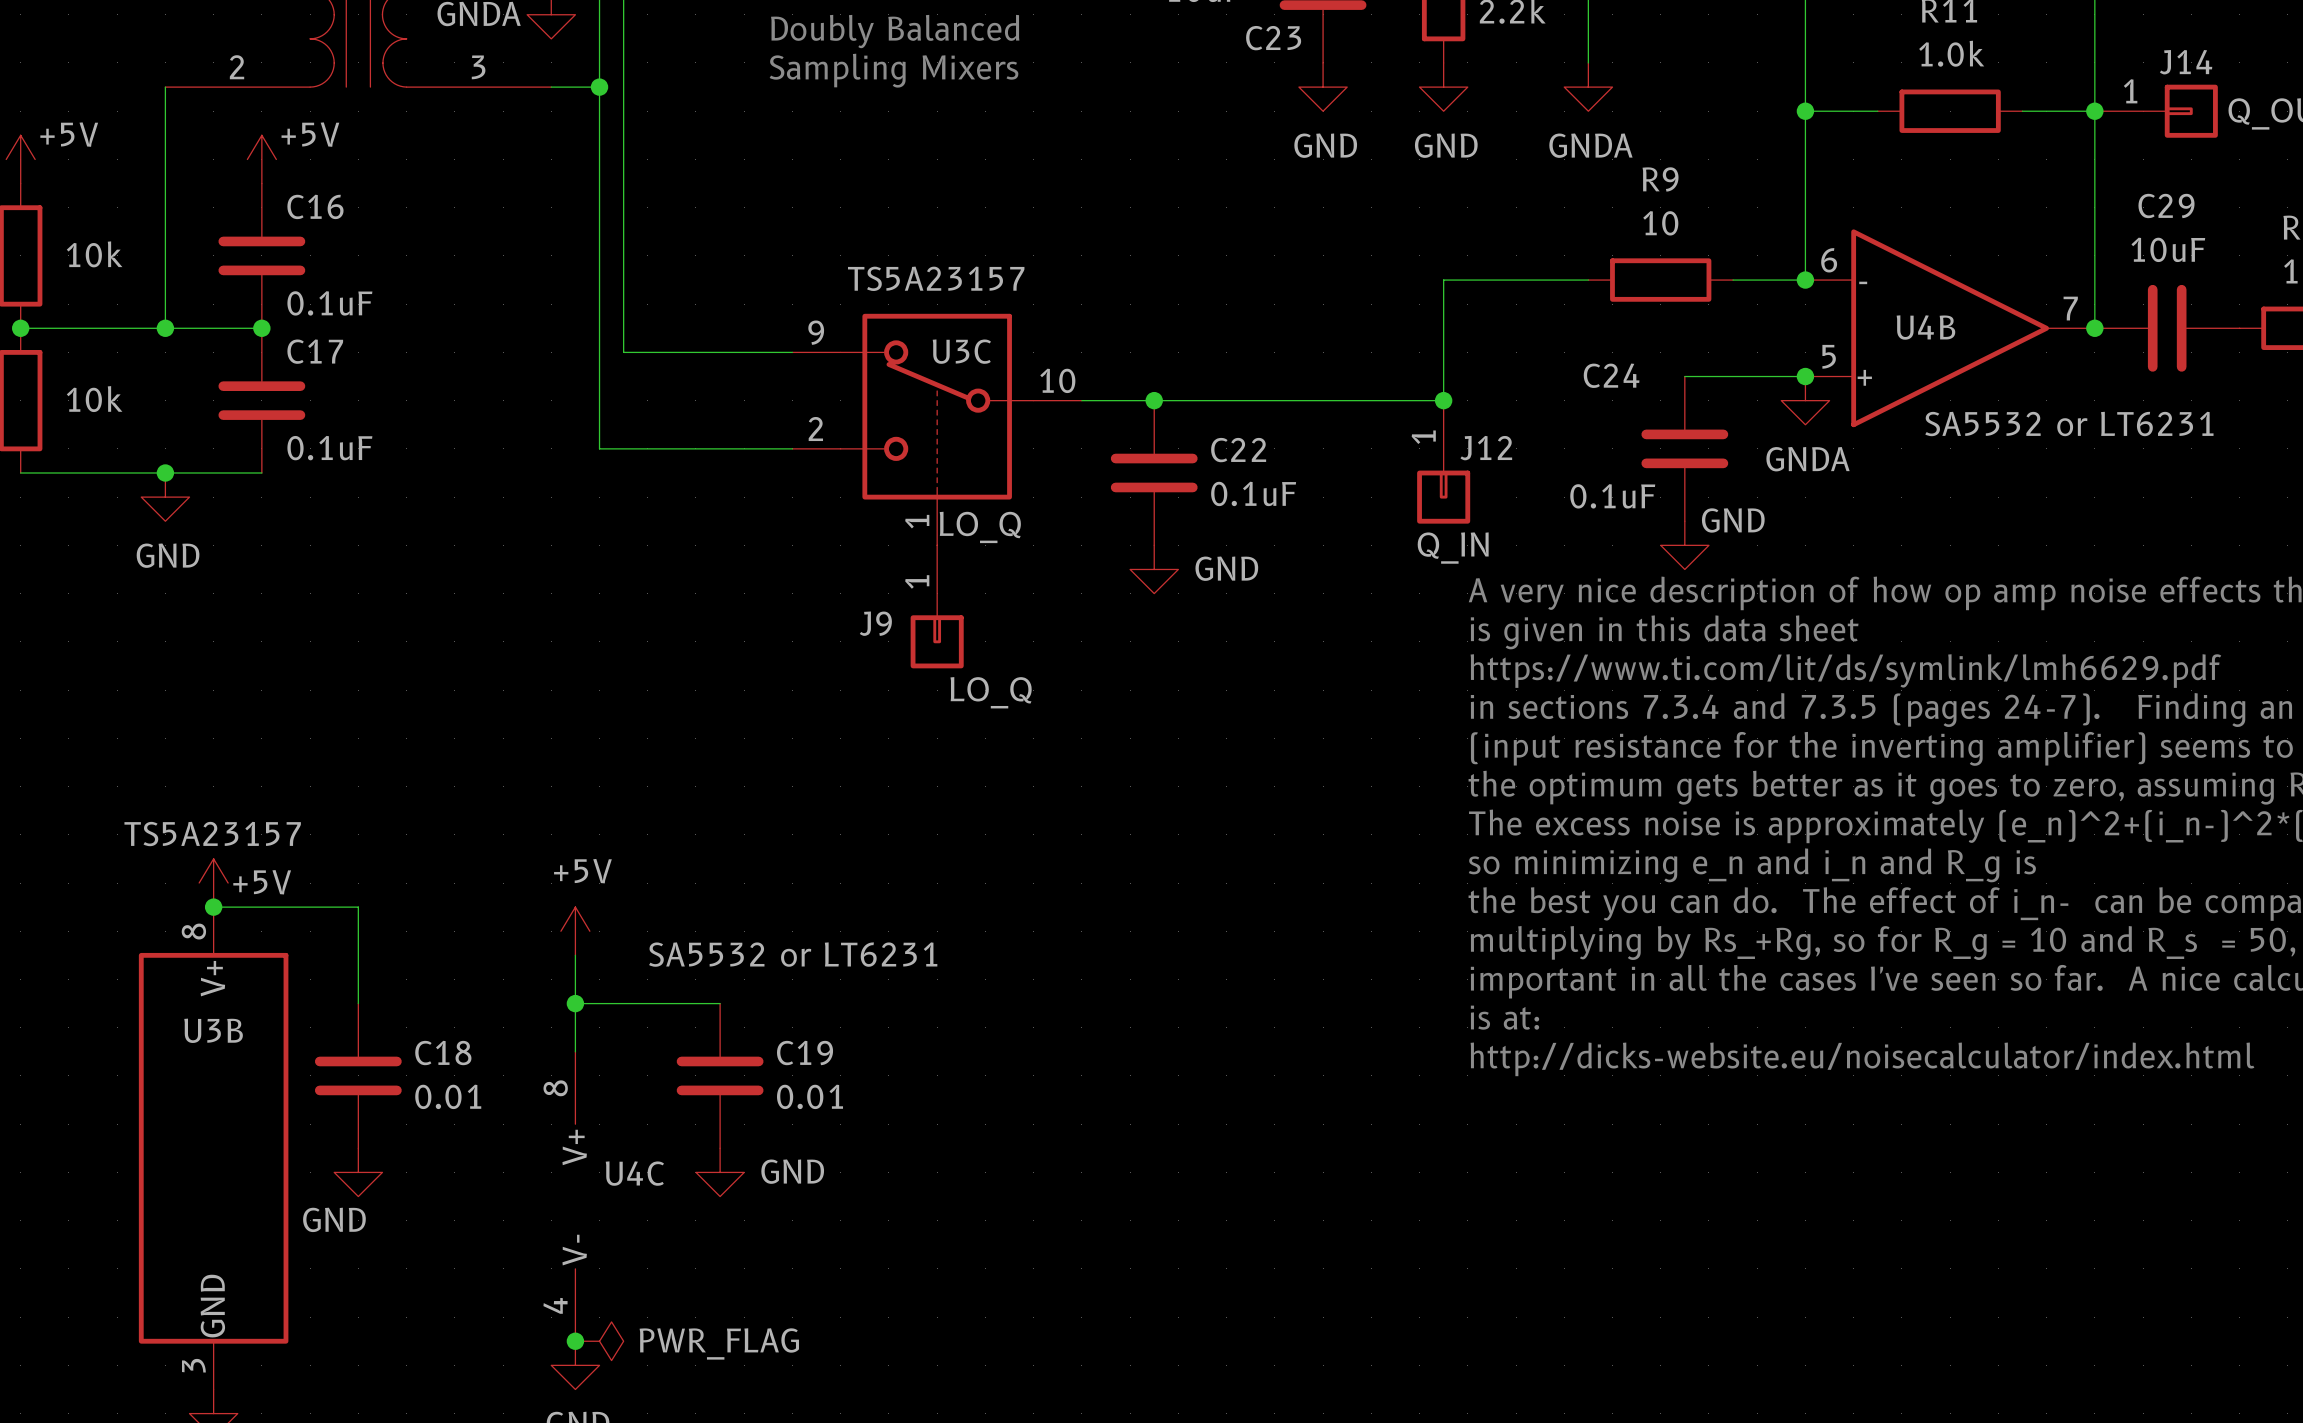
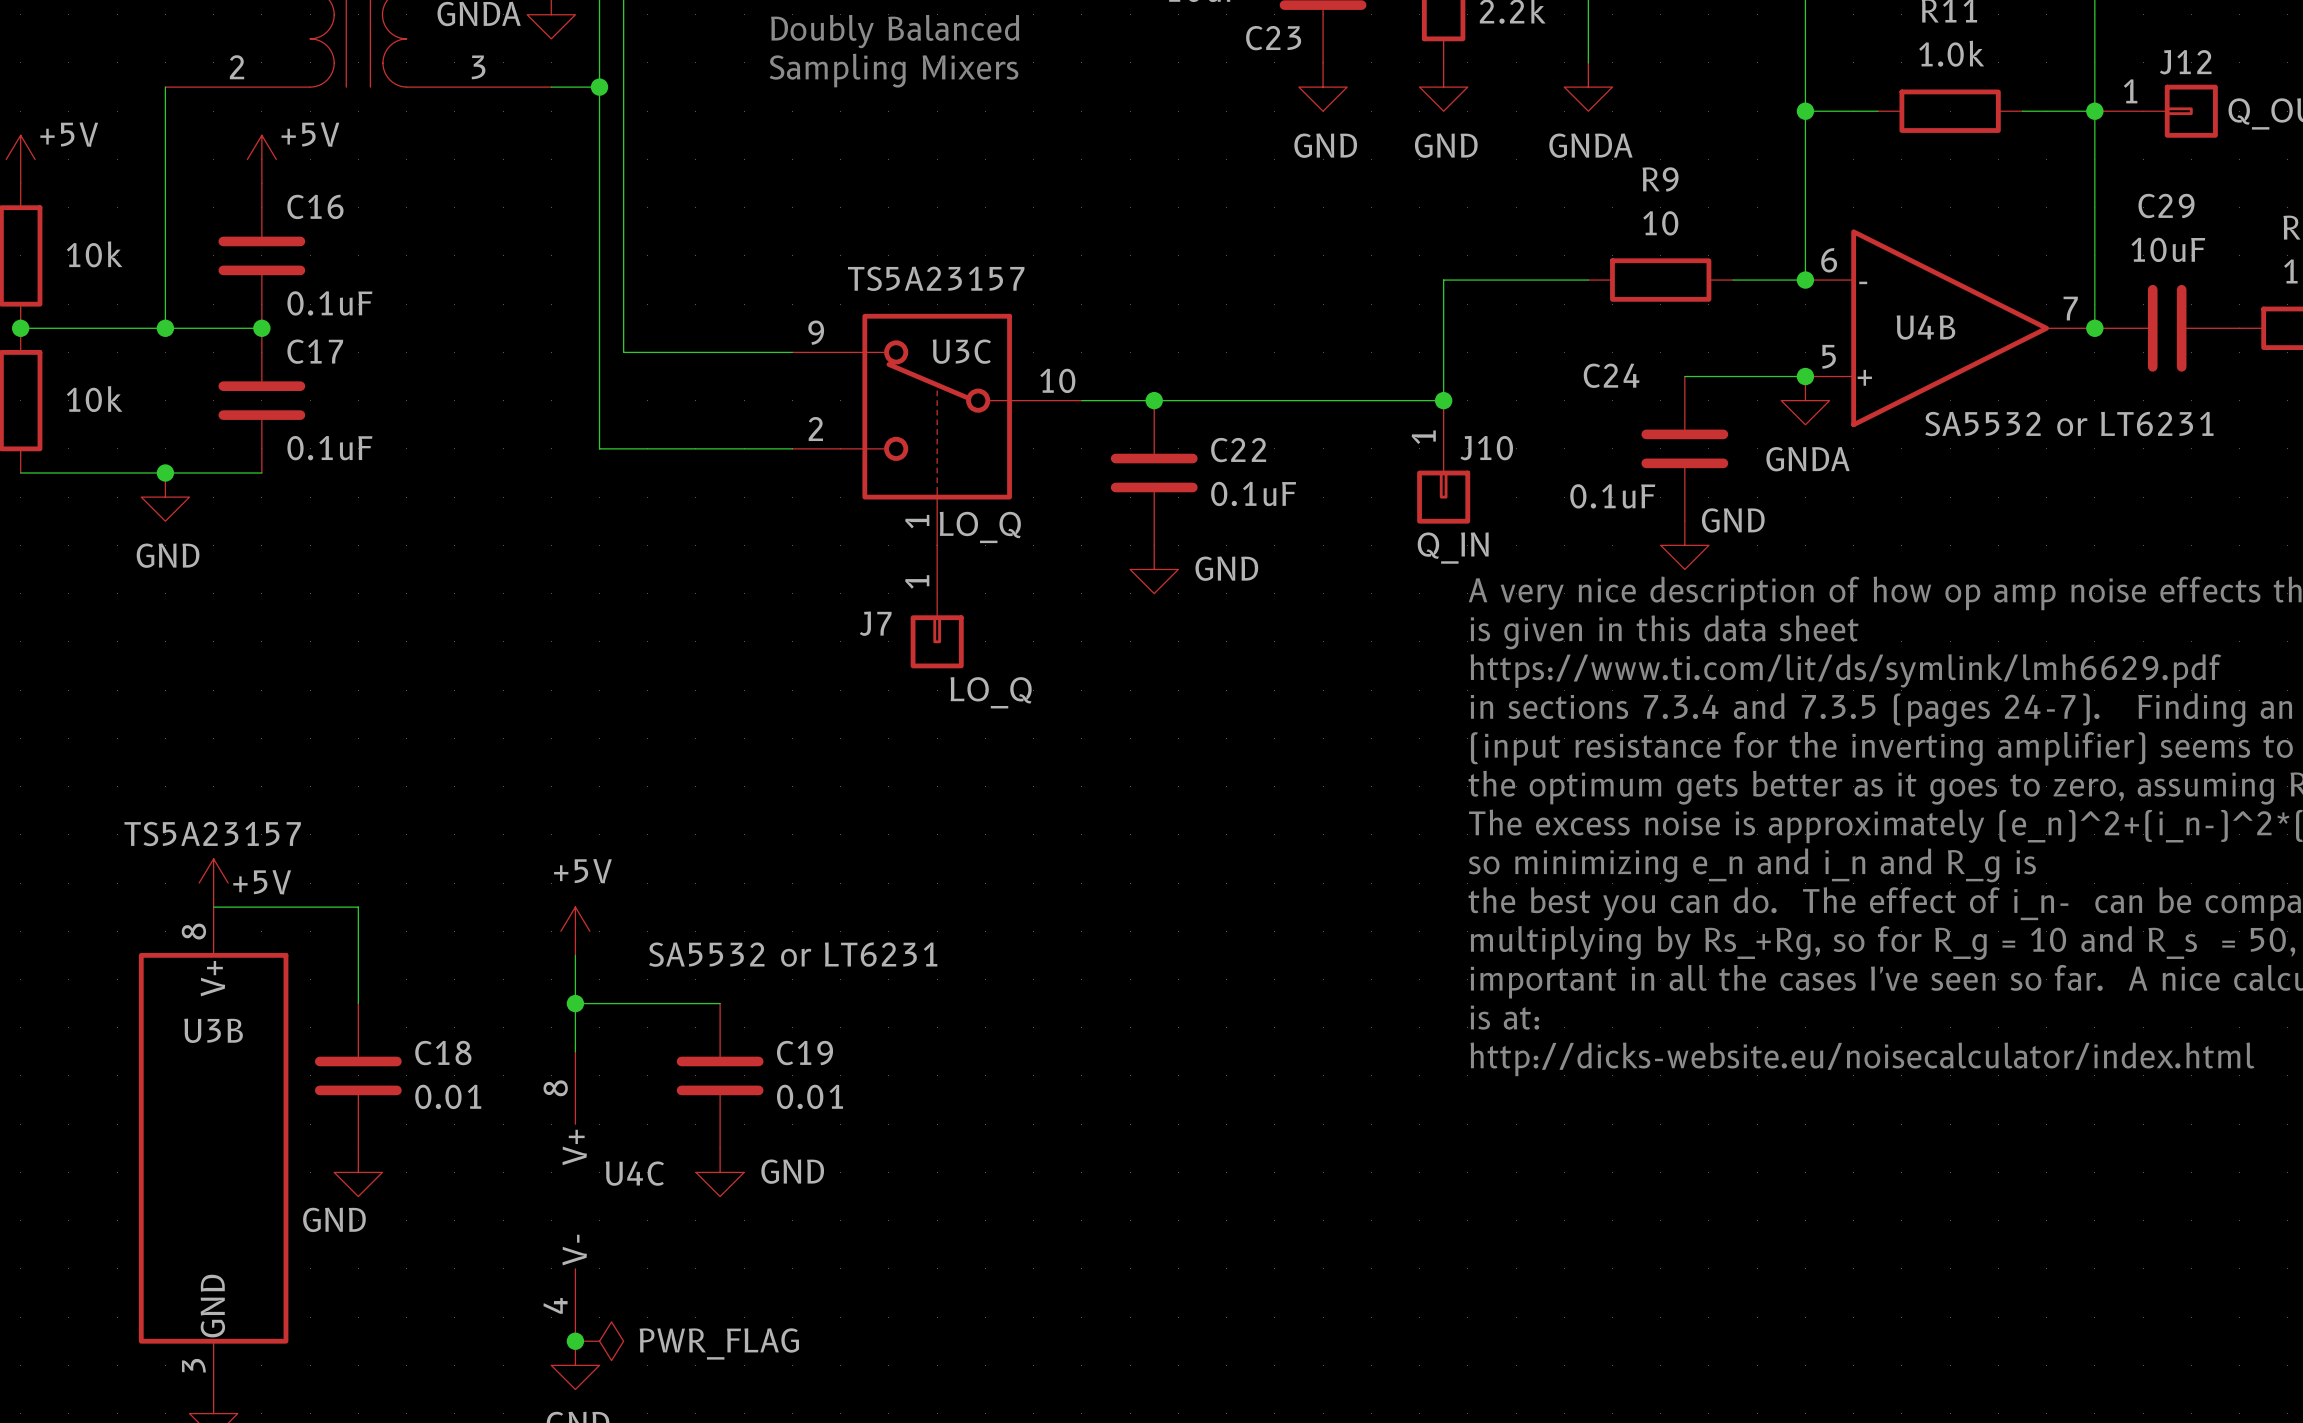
J14 name: J14 (2186, 62) -> J12 (2185, 62)
J12 name: J12 (1486, 448) -> J10 (1486, 448)
J9 name: J9 (875, 623) -> J7 (875, 623)
junction: (213, 907) -> none

